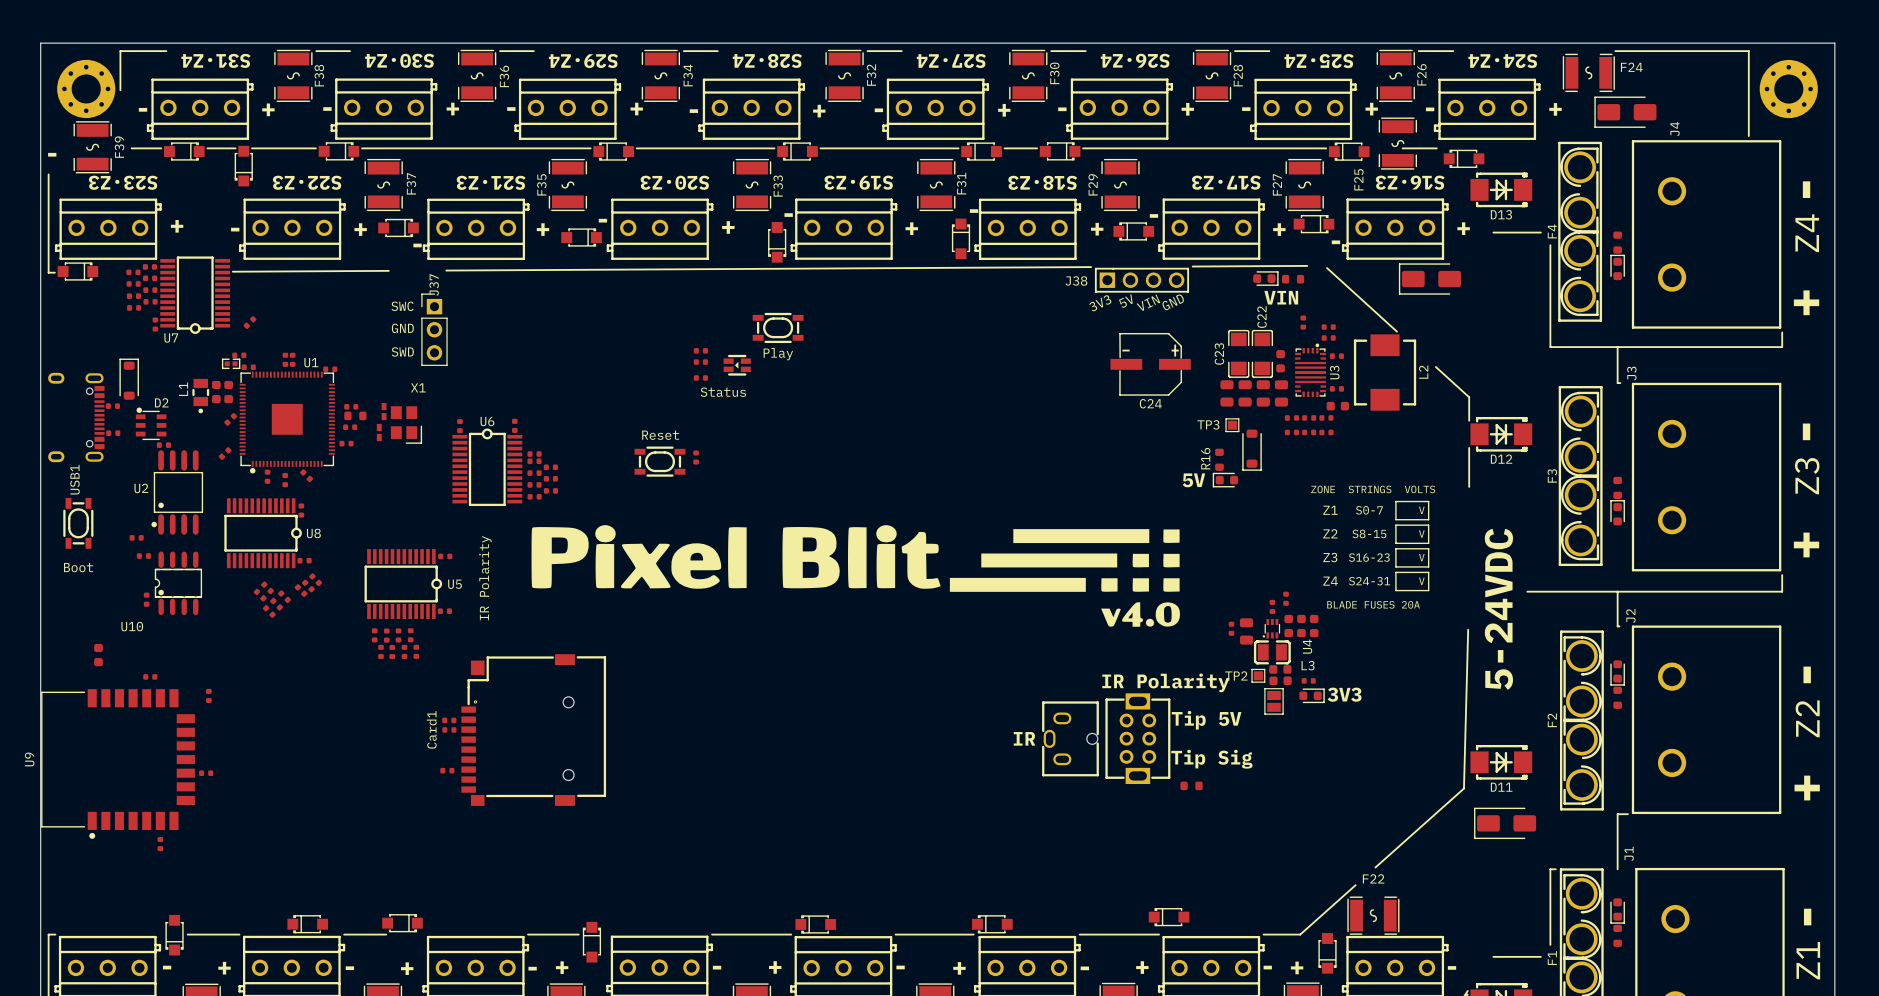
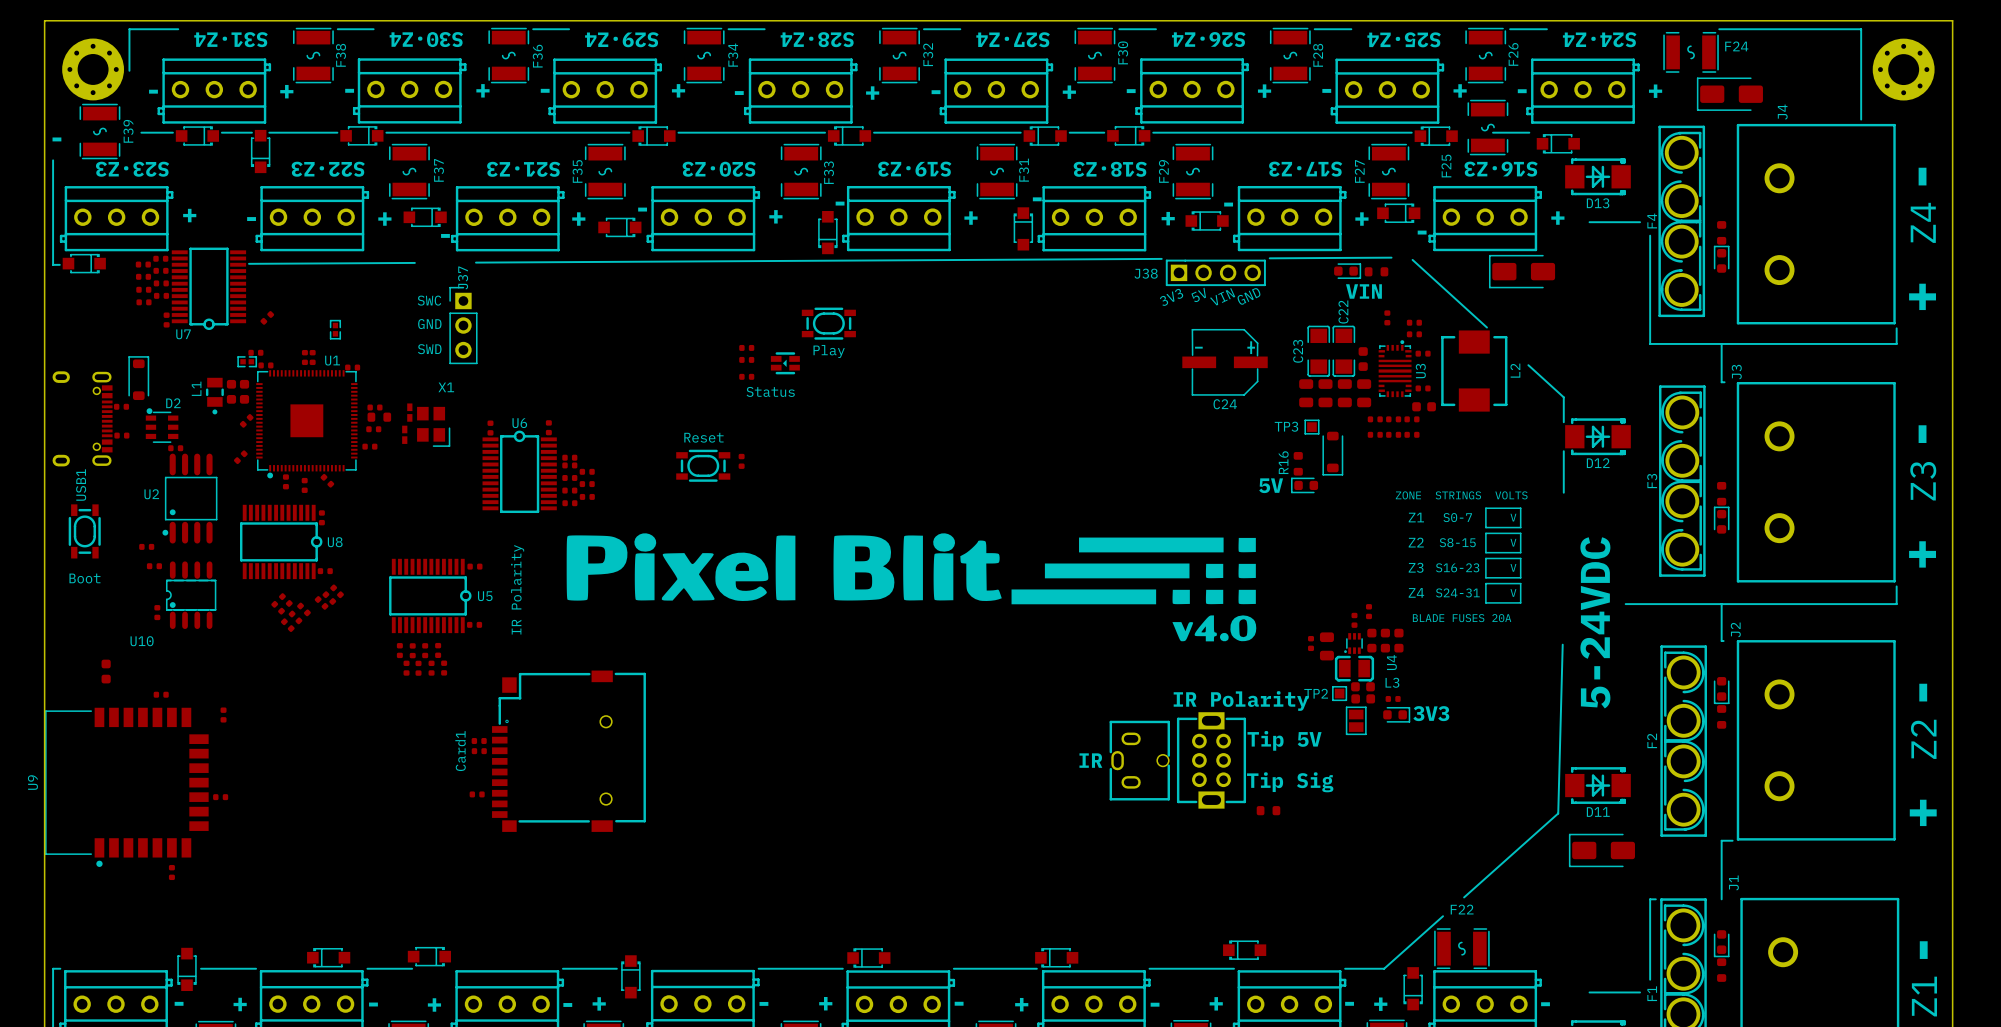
part: none -> (335, 329)

